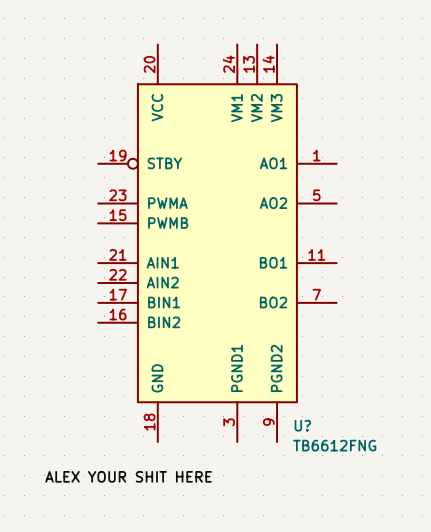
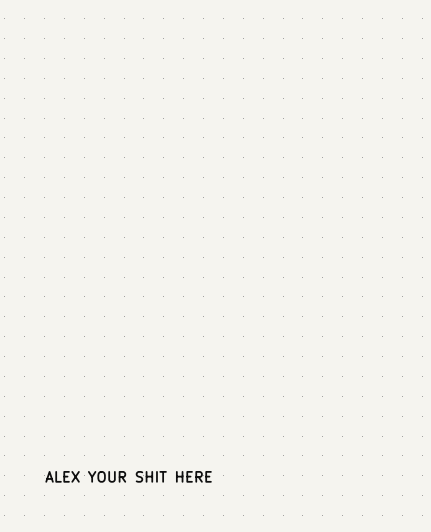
U?: TB6612FNG (217, 243) -> none

